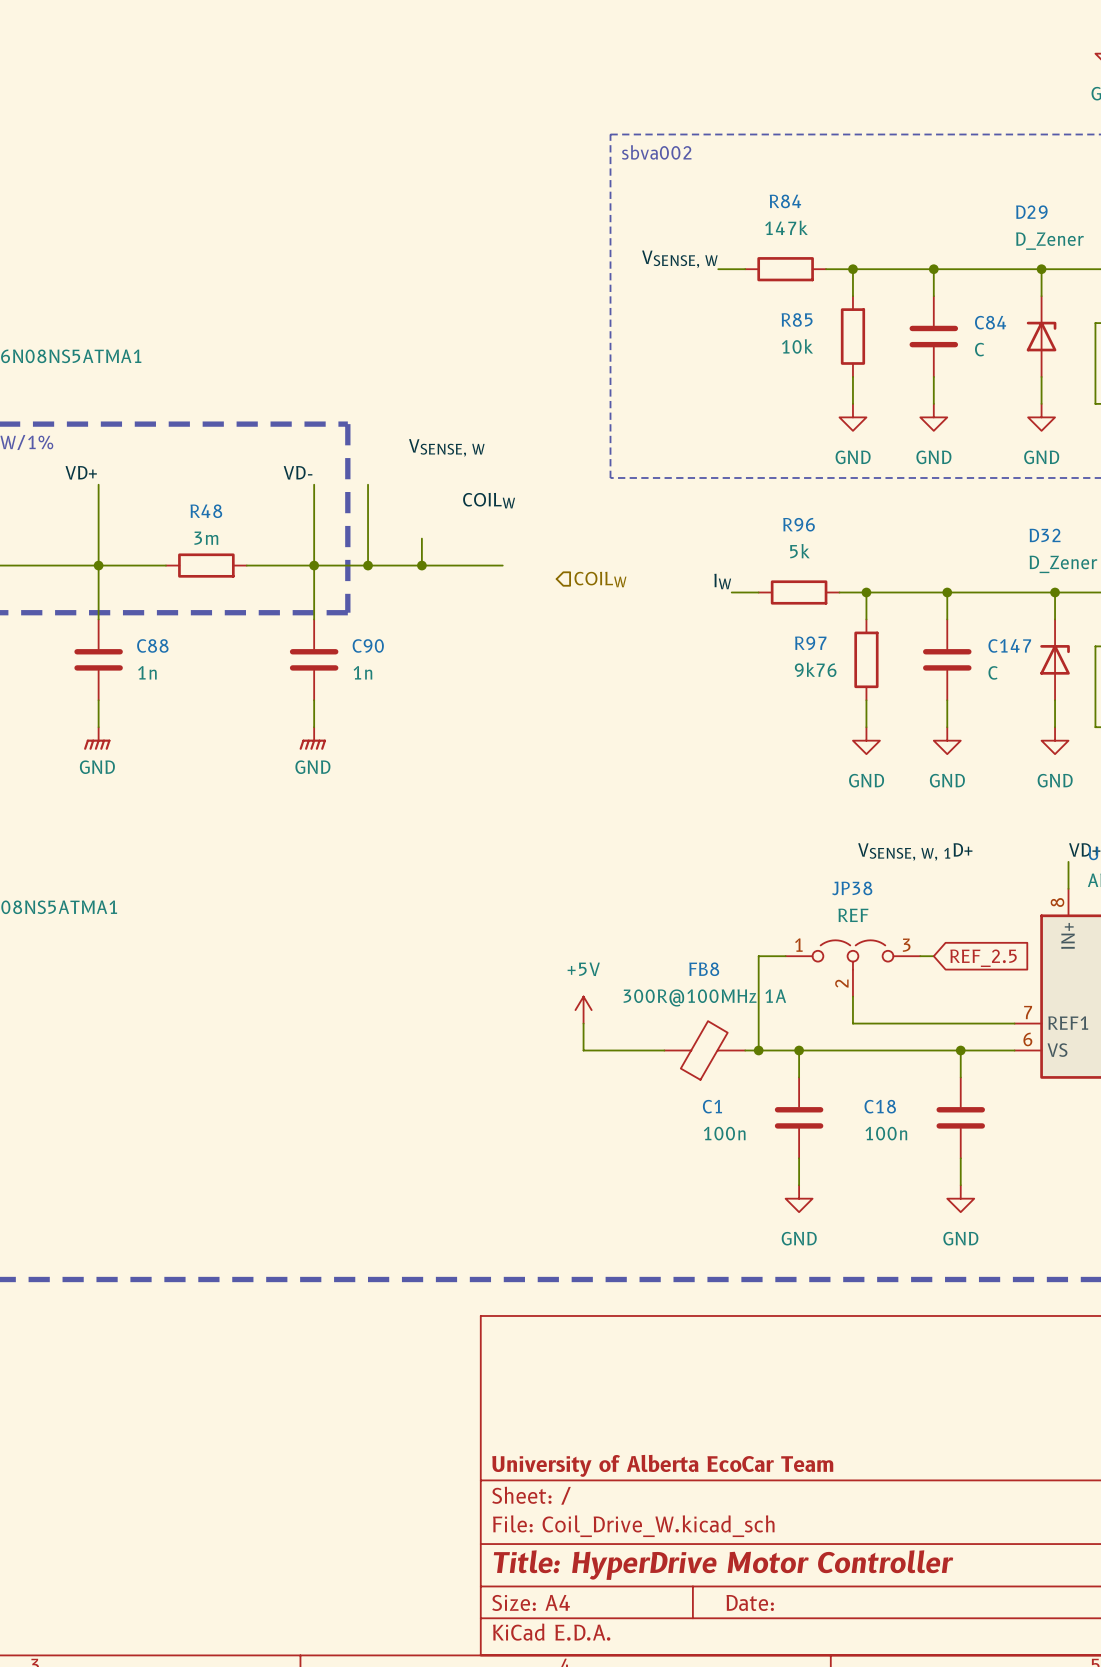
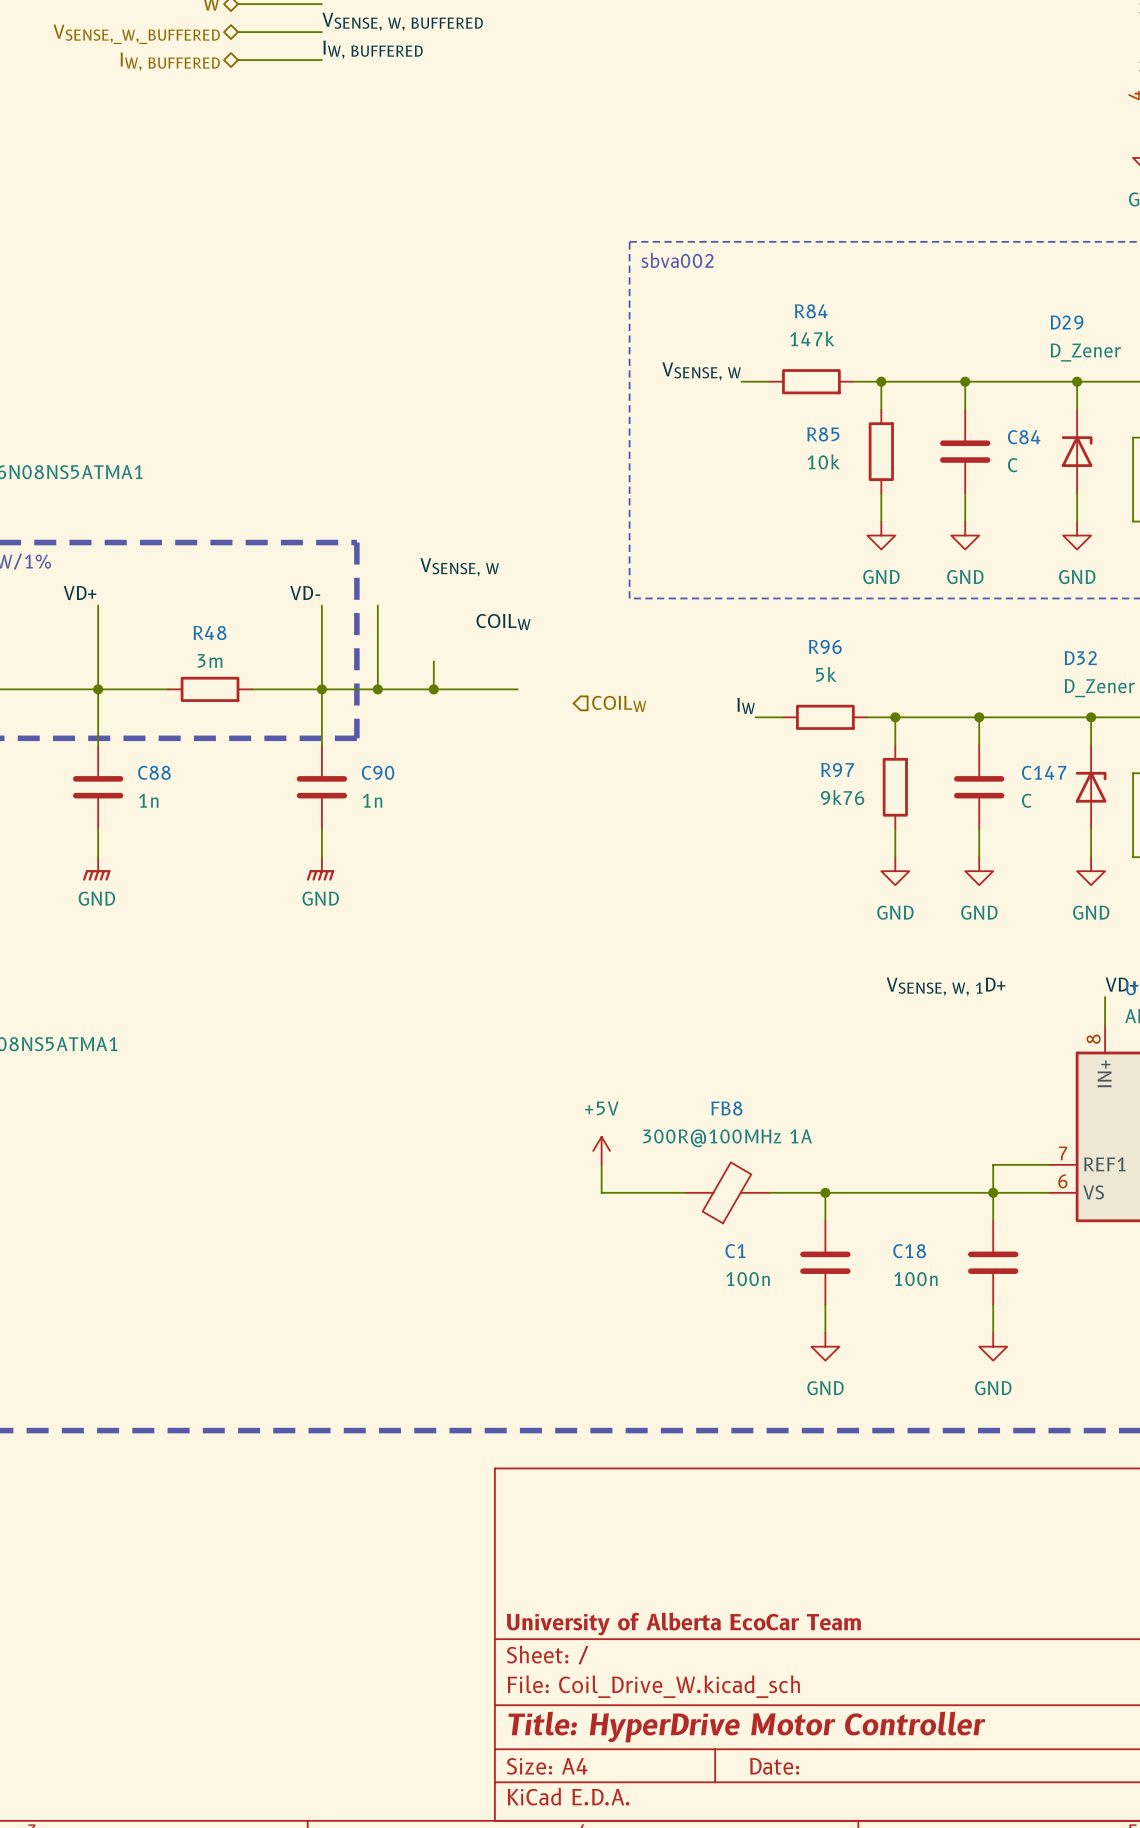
wire: (785, 956) (758, 956) (758, 1050) -> none
wire: (920, 956) (933, 956) -> none
global label: REF_2.5 (983, 958) -> none
JP38: REF (852, 968) -> none
wire: (852, 996) (852, 1023) (960, 1023) -> (993, 1192) (993, 1164)
junction: (758, 1050) -> none

